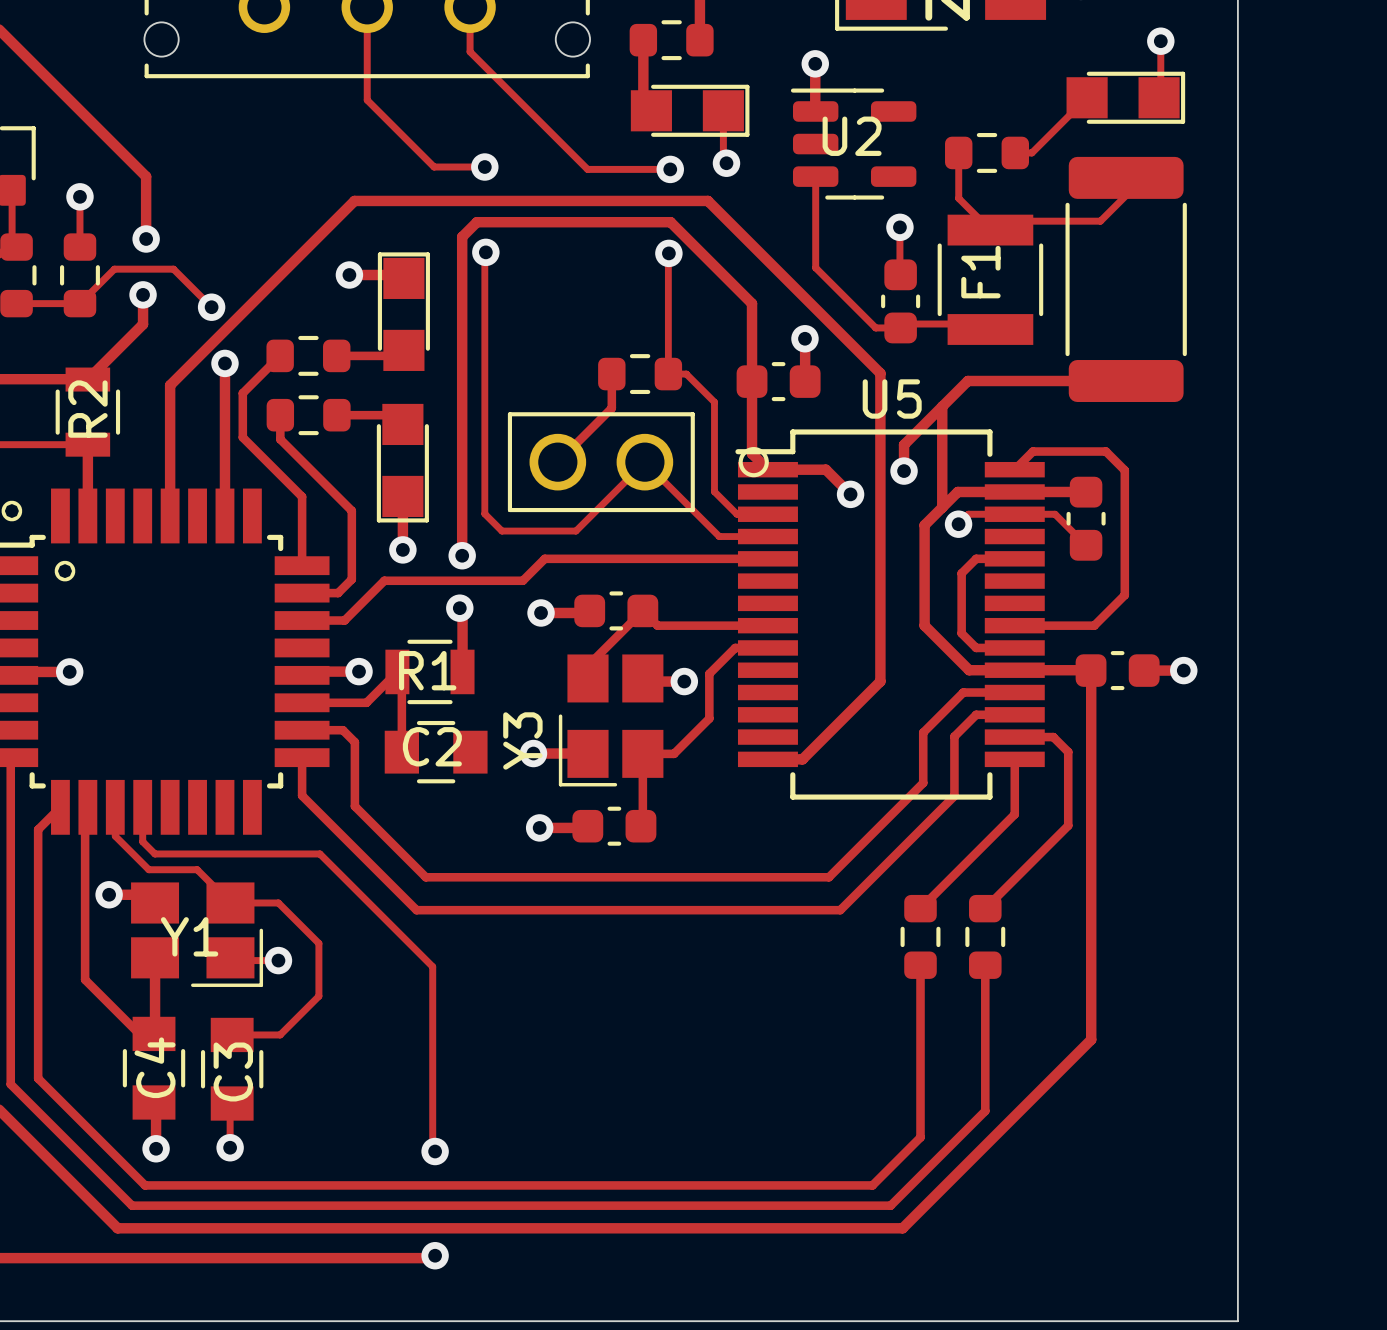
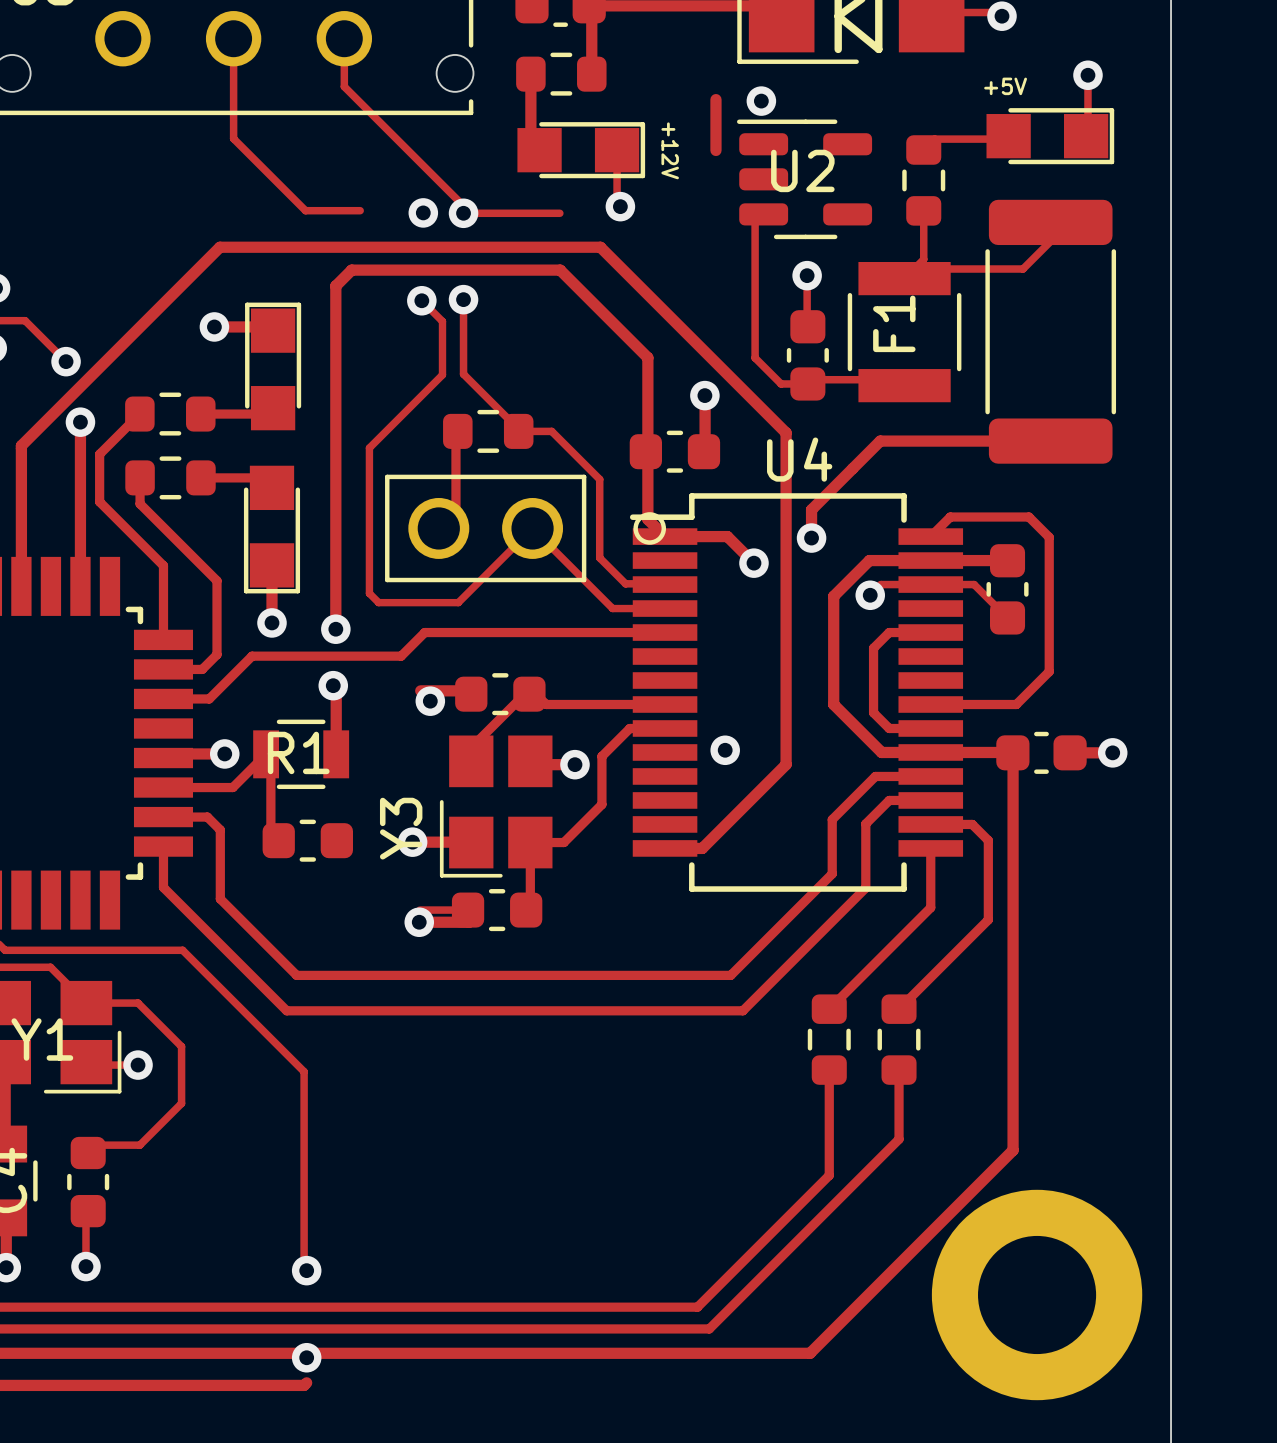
text: none -> +5V (1005, 86)
via position: (815, 63) -> (761, 101)
track: (1084, 100) (1031, 152) (1015, 152) -> (1005, 139) (934, 139) (923, 149)
text: none -> +12V (670, 150)
U2 position: (853, 144) -> (804, 179)
track: (958, 152) (958, 198) (990, 230) -> none
part rotation: 0° (987, 152) -> 90° clockwise (923, 180)
via: (484, 167) -> none
track: none -> (923, 210) (923, 259) (914, 269)
via: none -> (423, 212)
via: none -> (463, 213)
via: (670, 169) -> none
track: (815, 176) (815, 267) (851, 303) -> (763, 214) (755, 222) (755, 357)
via: none -> (463, 299)
via: none -> (421, 300)
track: (485, 252) (484, 513) (493, 522) -> (421, 300) (442, 321) (442, 374) (369, 448) (369, 593)
via: (485, 252) -> none
track: (668, 253) (668, 374) (686, 374) (714, 402) (714, 491) (736, 514) (767, 514) -> (463, 299) (463, 374) (518, 431) (551, 431) (599, 479) (599, 557) (625, 583) (665, 583)
via: (668, 253) -> none
part footprint: [736, 362, 821, 402] -> [629, 430, 721, 473]
track: (611, 374) (611, 408) (573, 446) -> (455, 433) (455, 511)
part position: (640, 374) -> (488, 431)
U5 name: U5 (892, 399) -> U4 (799, 459)
track: (942, 406) (942, 507) -> none
part footprint: [574, 591, 659, 631] -> [455, 673, 546, 716]
via position: (541, 612) -> (430, 701)
via: none -> (725, 750)
C2: (436, 752) -> none
part: none -> (307, 840)
part footprint: [572, 806, 657, 846] -> [451, 889, 543, 932]
track: none -> (419, 910) (468, 910)
track: (985, 1029) (985, 1111) (890, 1205) (809, 1205) -> (899, 1139) (709, 1328)
track: (920, 1063) (920, 1137) (872, 1185) (798, 1185) -> (829, 1175) (697, 1307)
C3: (232, 1069) -> none
part: none -> (88, 1182)
part: none -> (1037, 1295)
via position: (435, 1255) -> (306, 1357)

